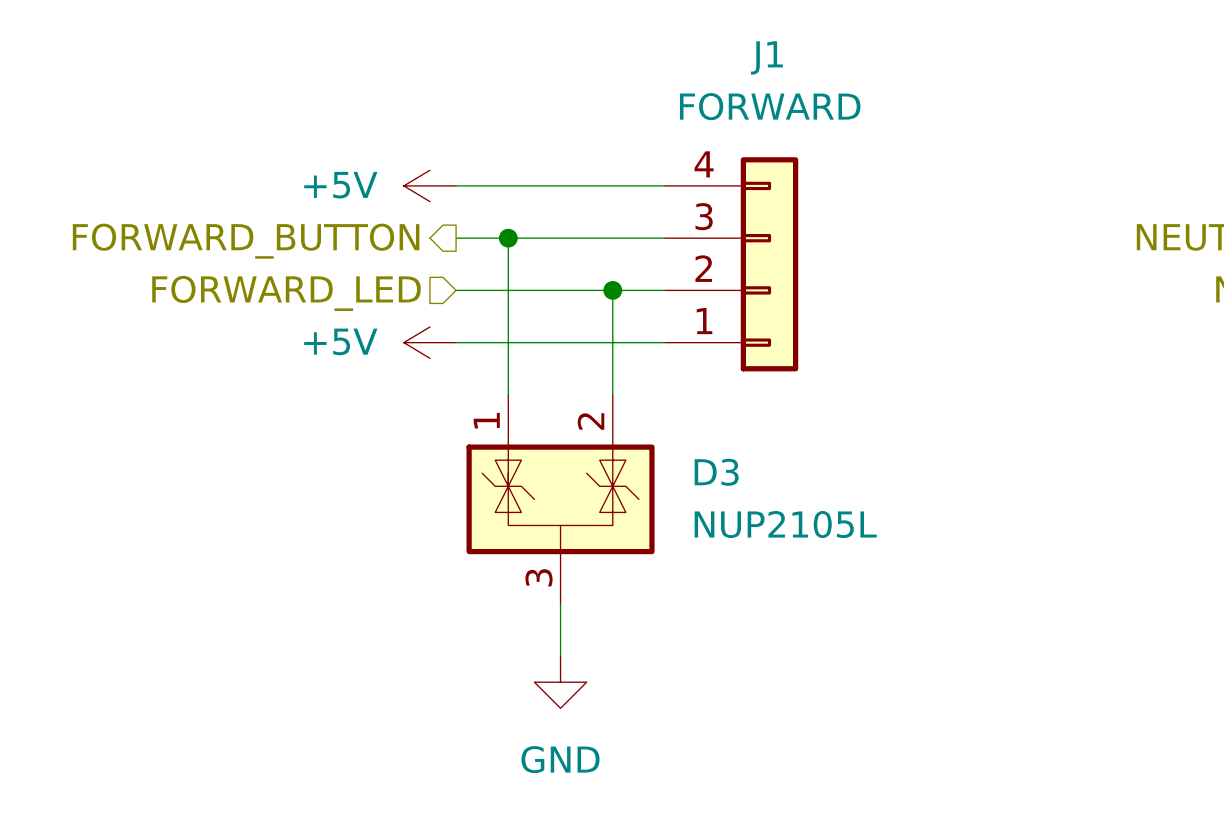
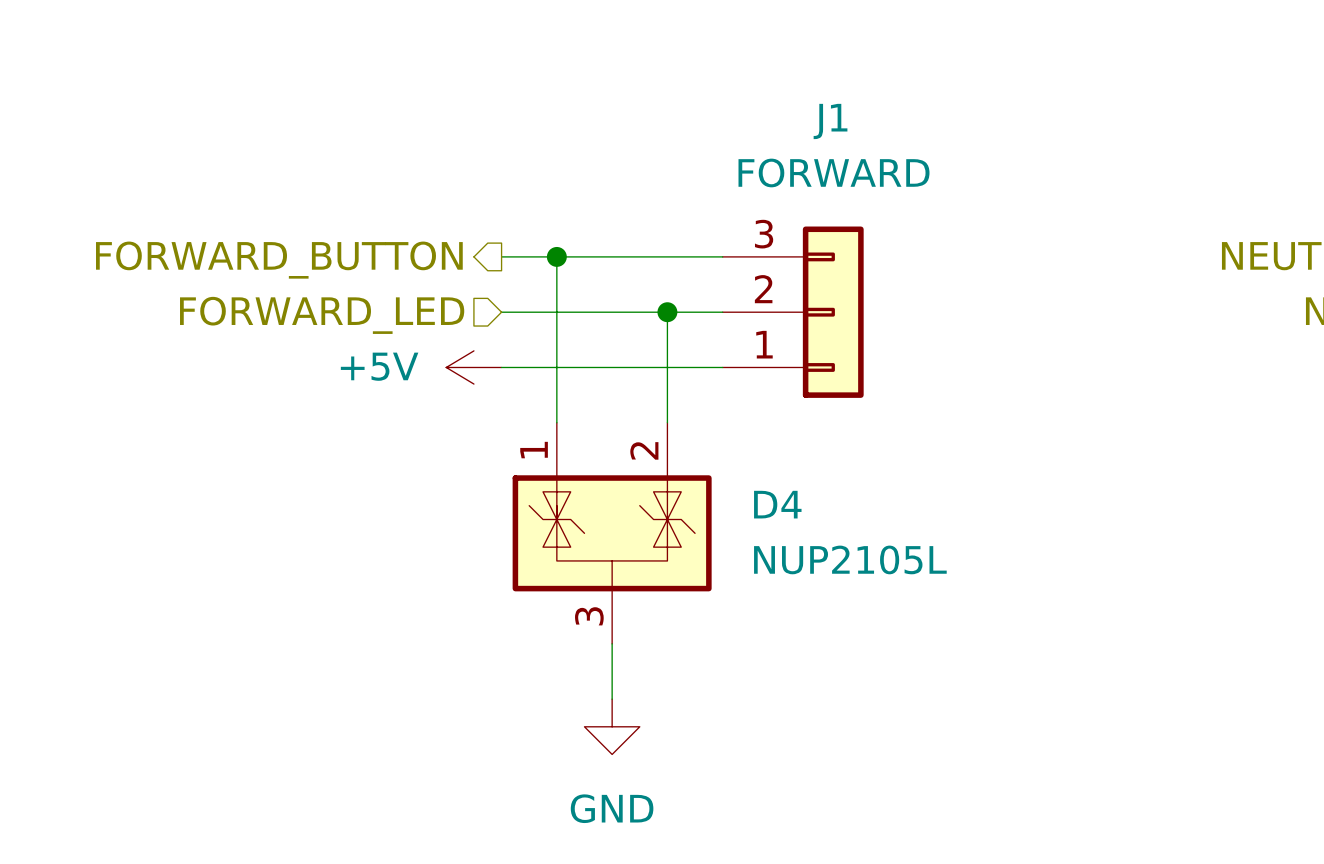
J1 symbol: [665, 157, 799, 372] -> [722, 226, 864, 398]
power symbol: +5V (429, 185) -> none
wire: (456, 185) (665, 185) -> none
D3 name: D3 (716, 472) -> D4 (777, 504)

